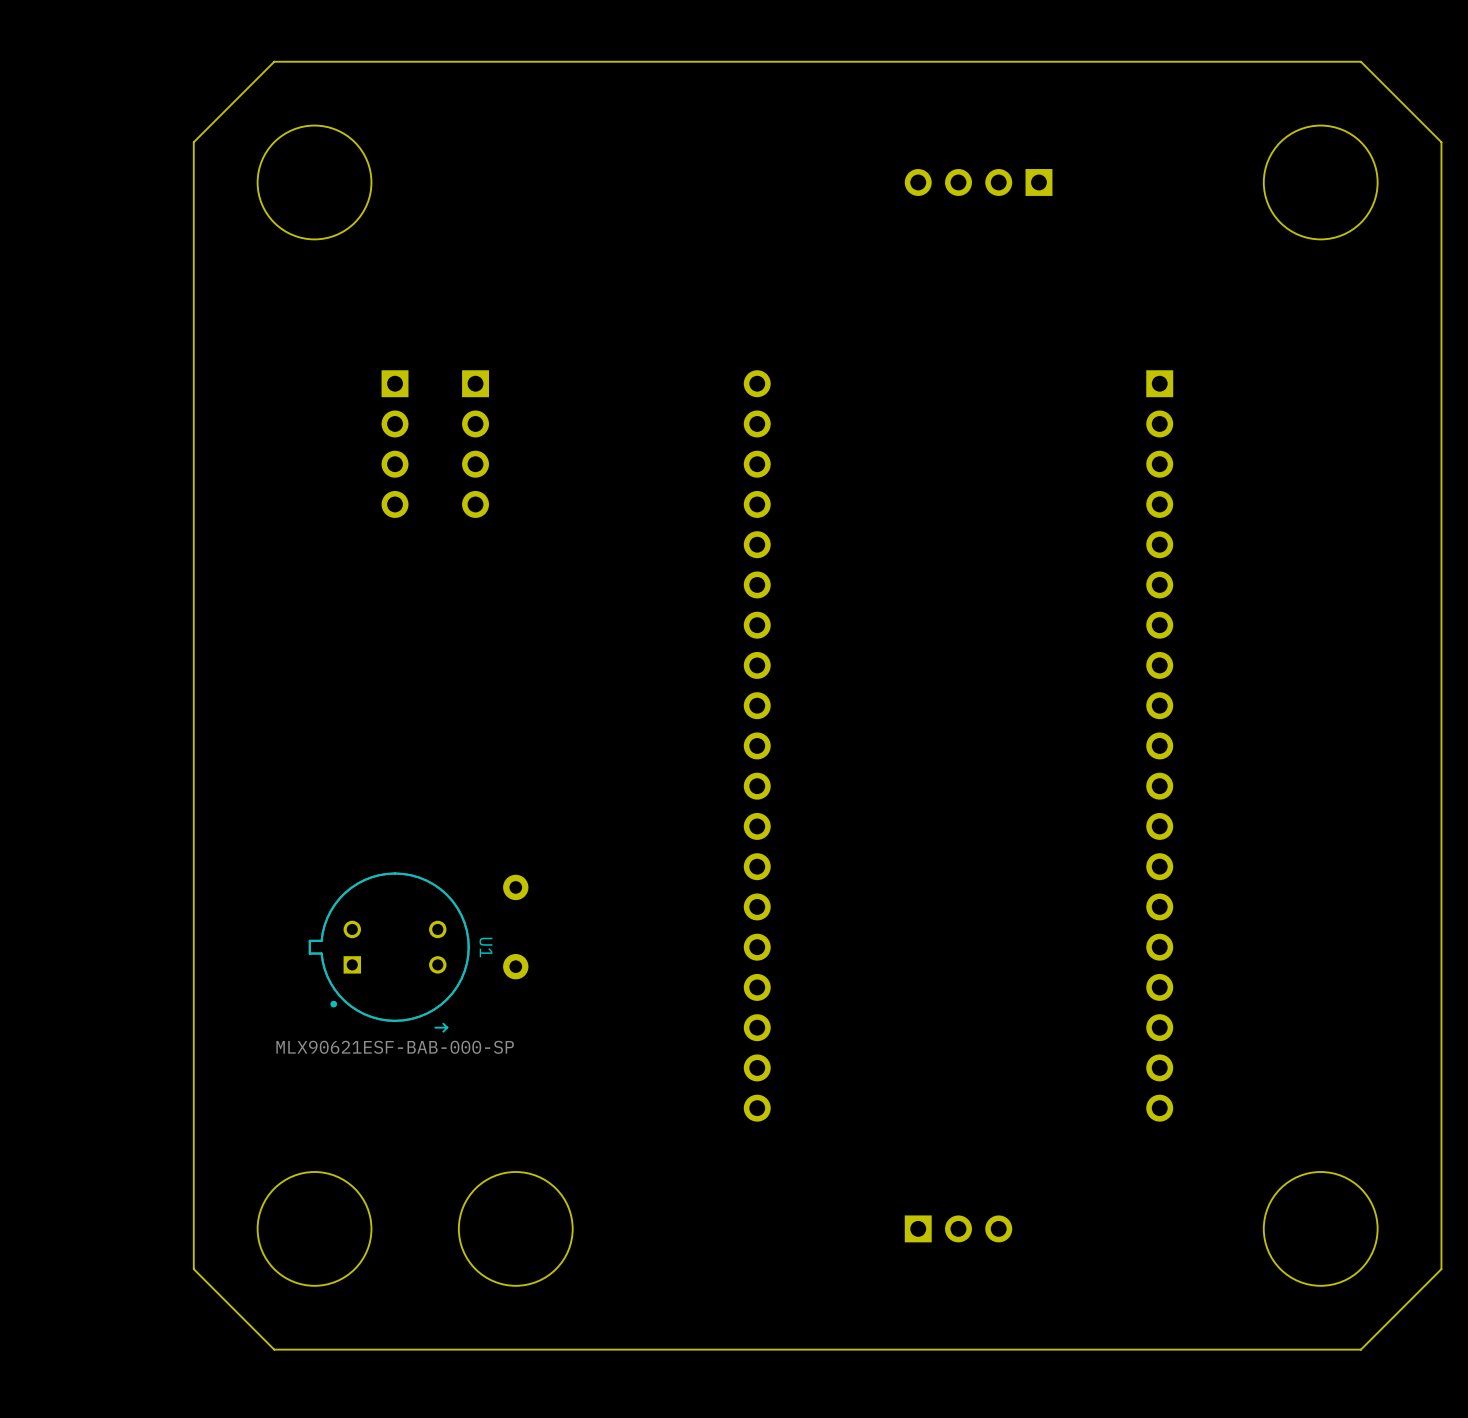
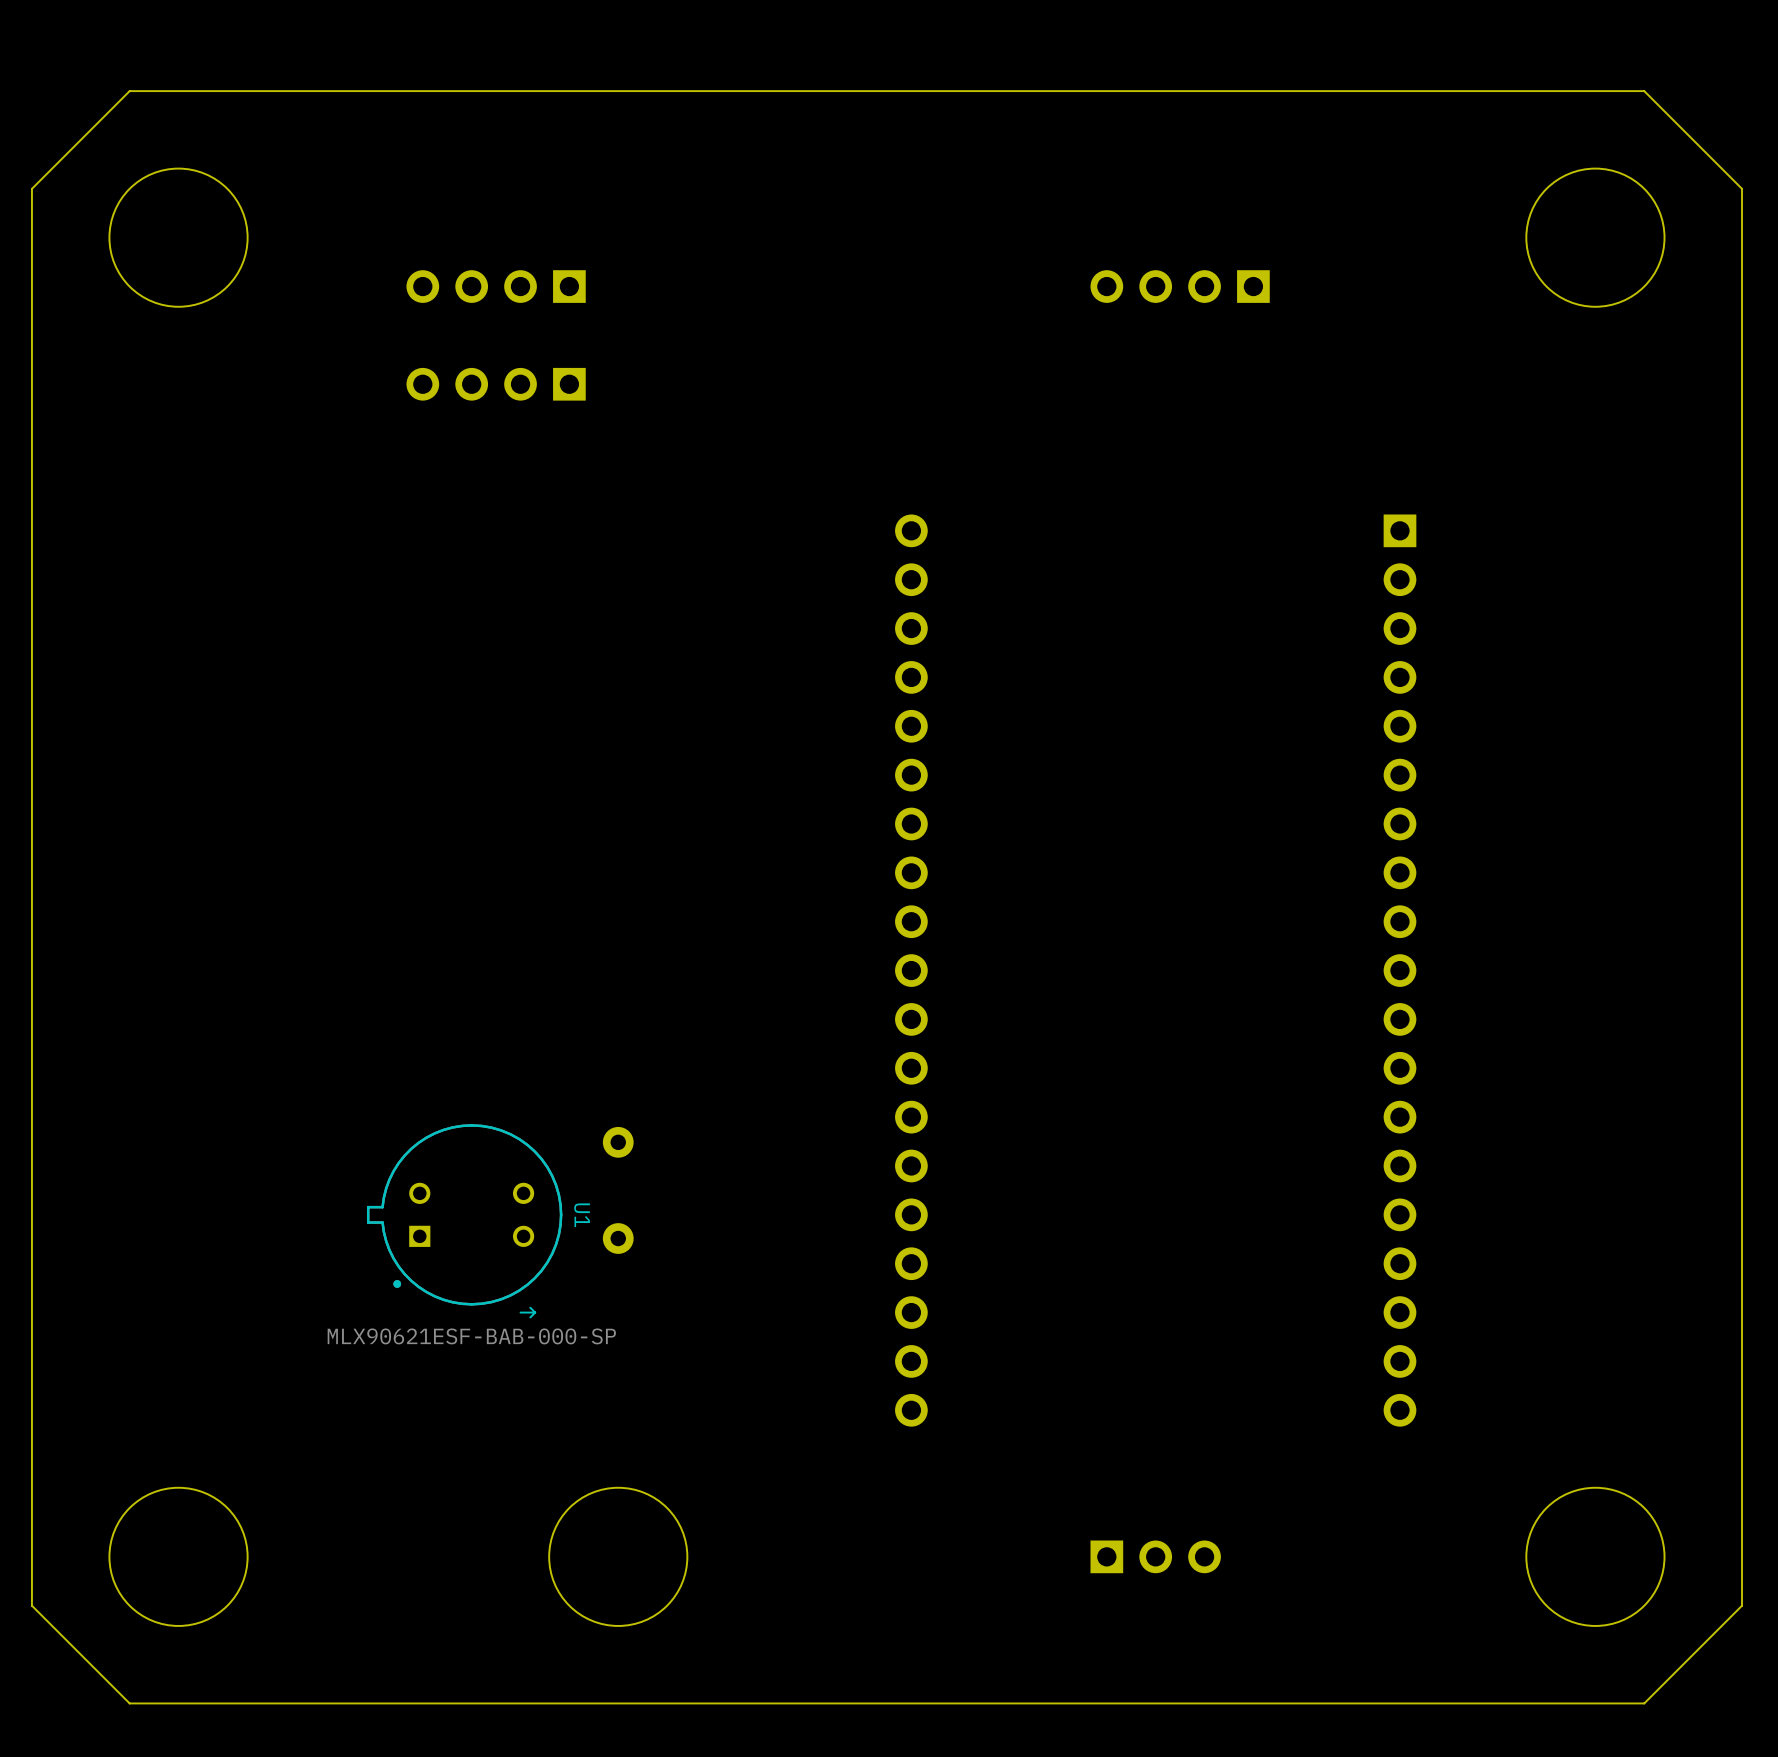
board edge: (1441, 142) (1360, 61) (274, 61) (193, 142) (193, 1269) (274, 1349) -> (1742, 237) (1742, 188) (1644, 91) (129, 91) (31, 188) (31, 1605) (129, 1703) (325, 1703)
round board edge position: (314, 182) -> (178, 237)
part: none -> (496, 286)
round board edge position: (1320, 182) -> (1595, 237)
part: none -> (496, 384)
part: (395, 444) -> none
part: (475, 444) -> none
round board edge position: (314, 1228) -> (178, 1556)

